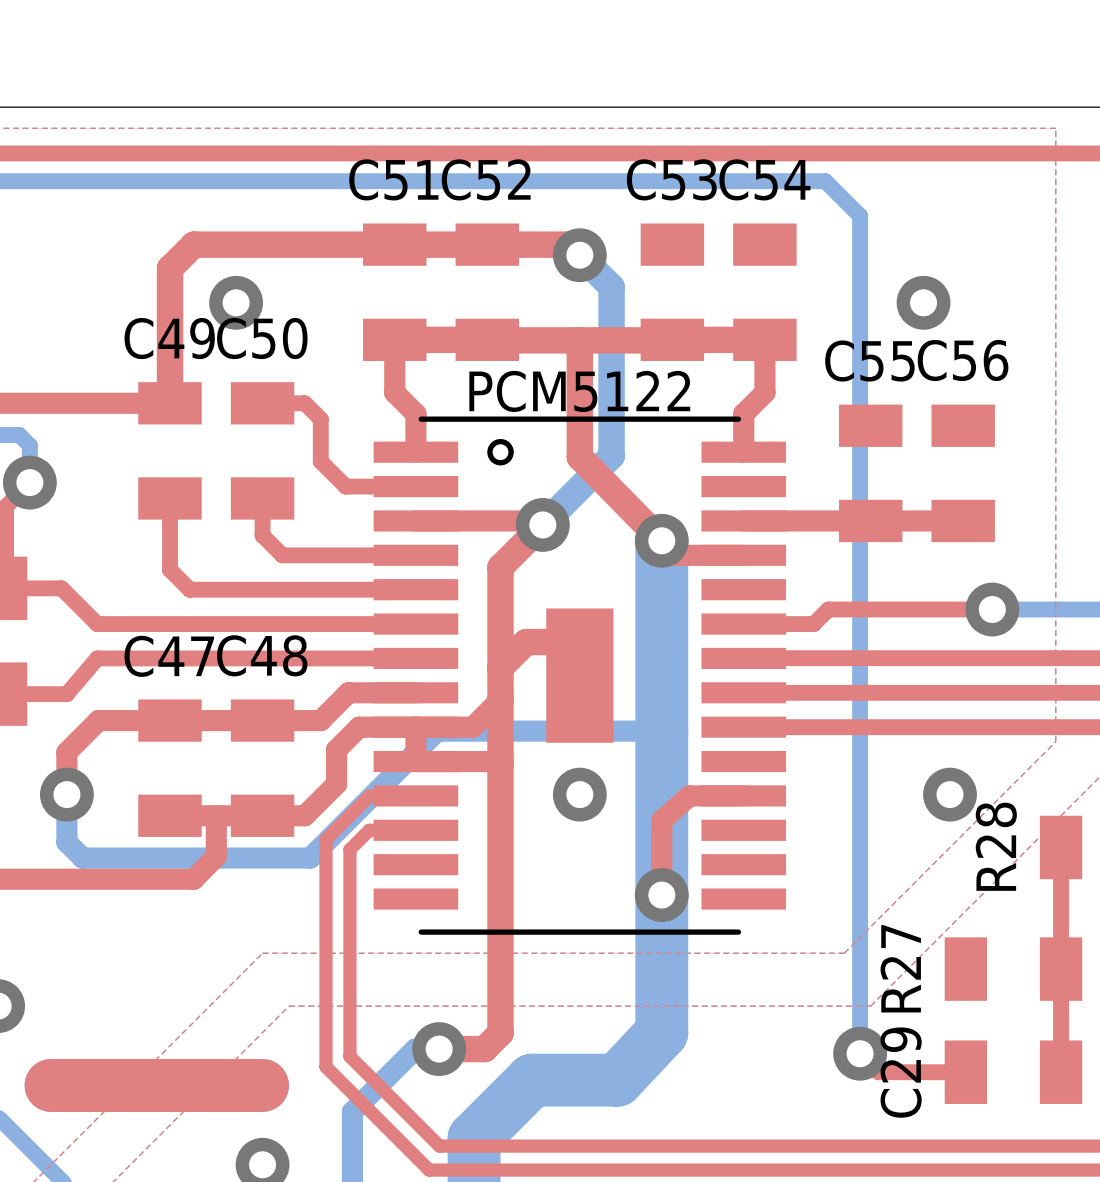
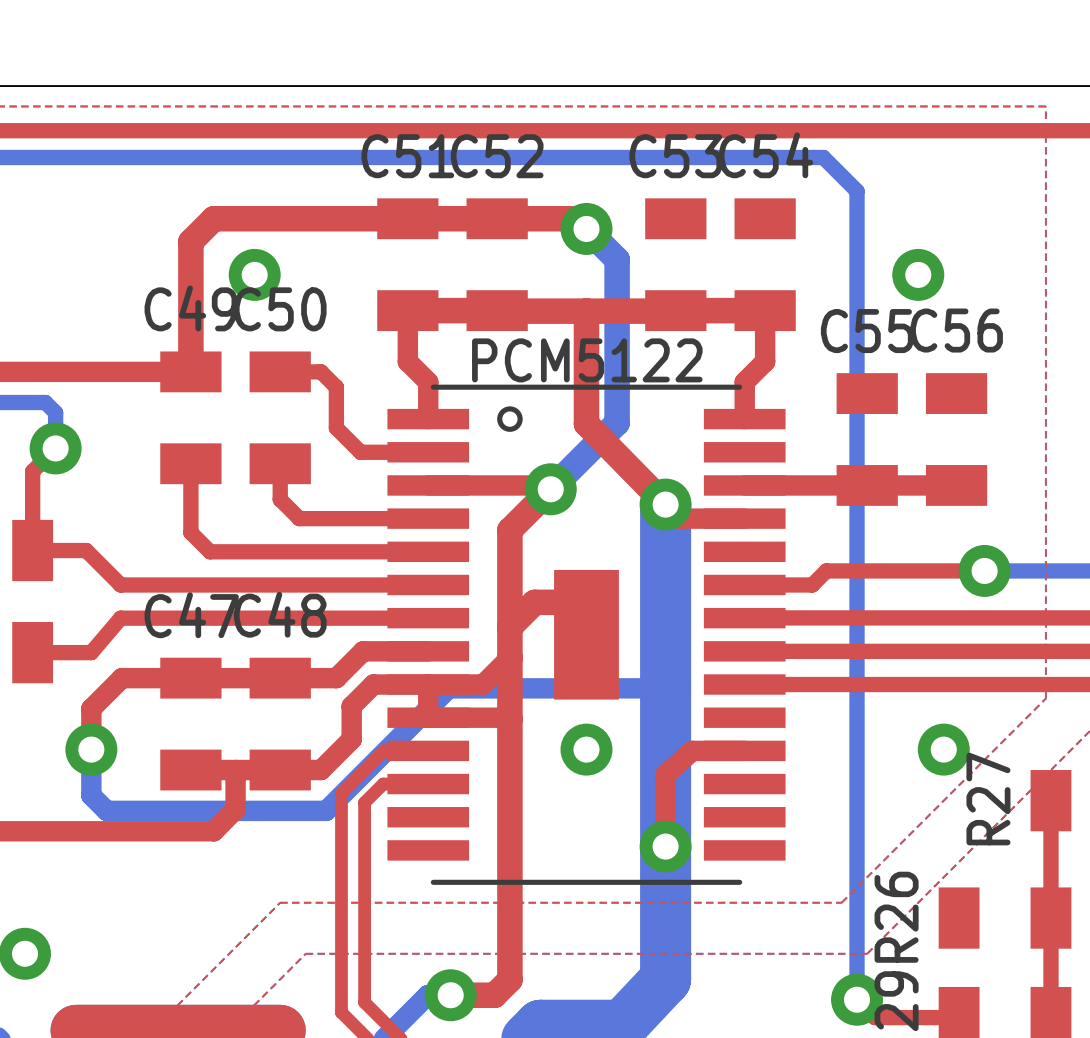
R28 name: R28 (996, 846) -> R27 (988, 799)
R27 name: R27 (900, 968) -> R26 (896, 917)

